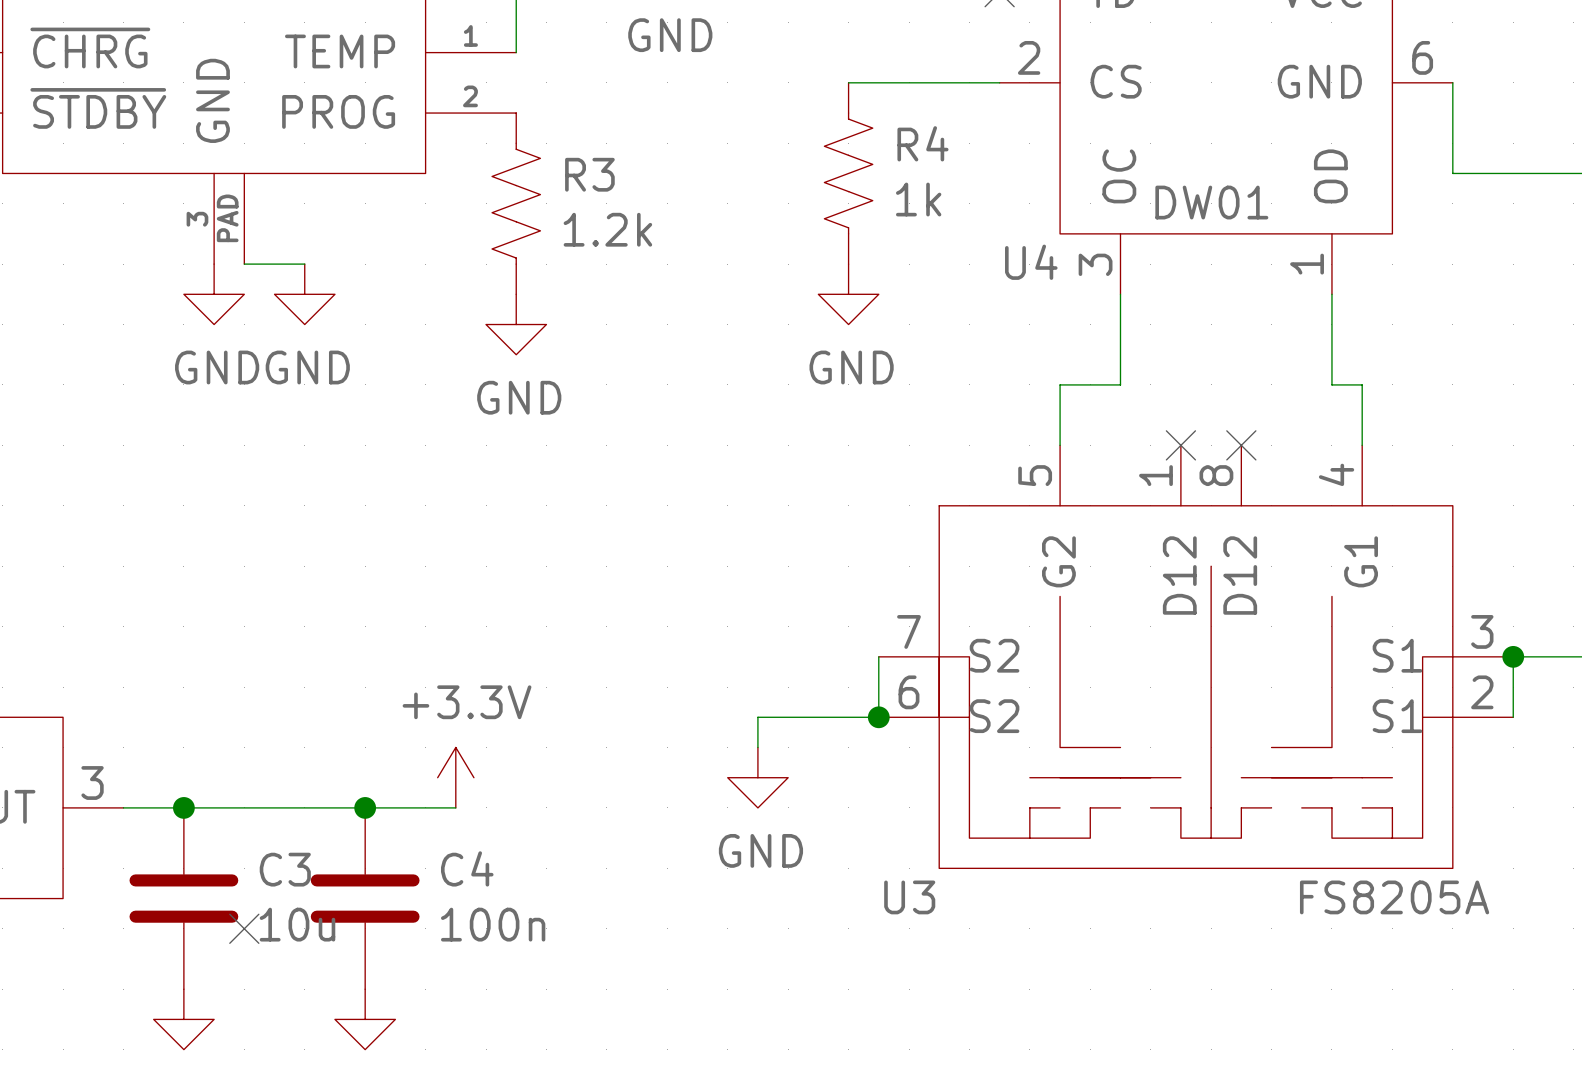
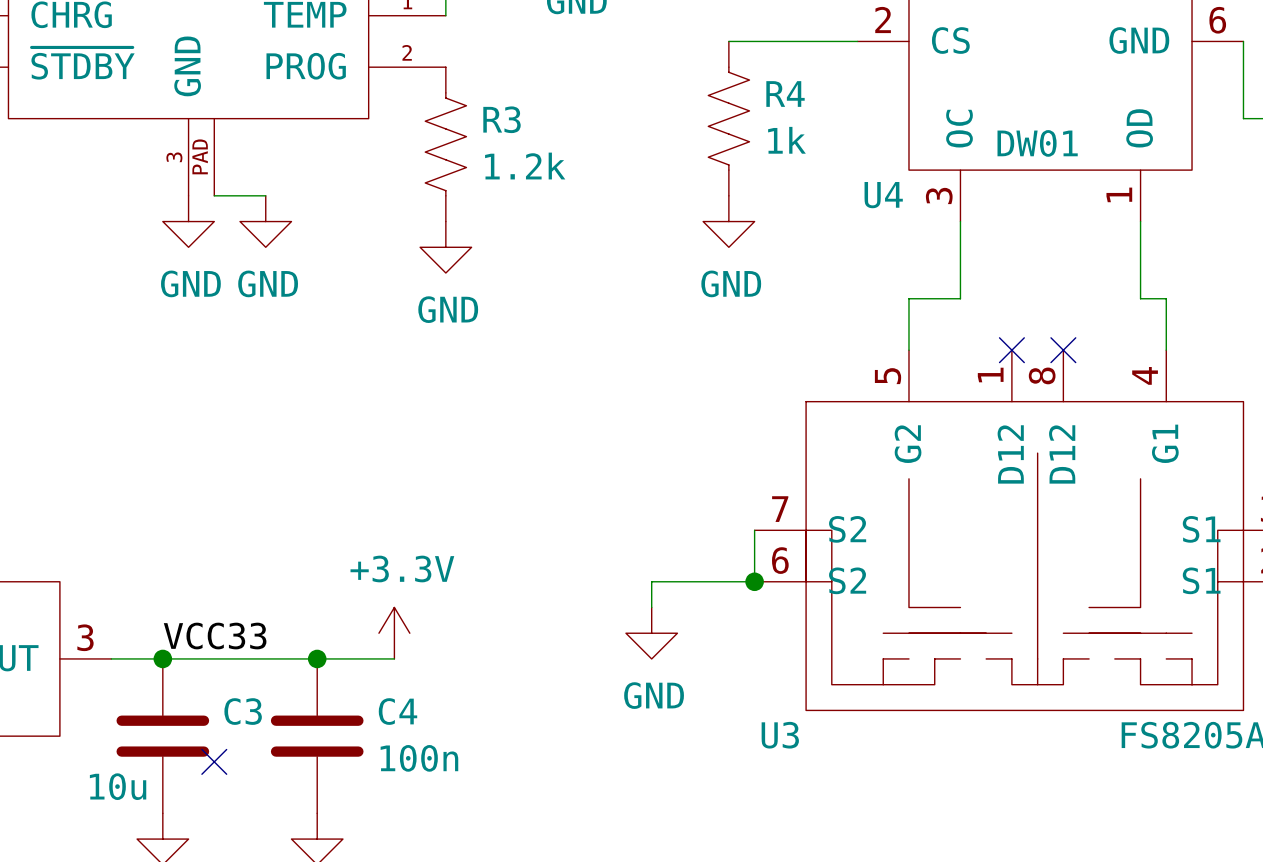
label: none -> VCC33 (215, 636)
C3 value position: 10u (297, 924) -> 10u (118, 786)

